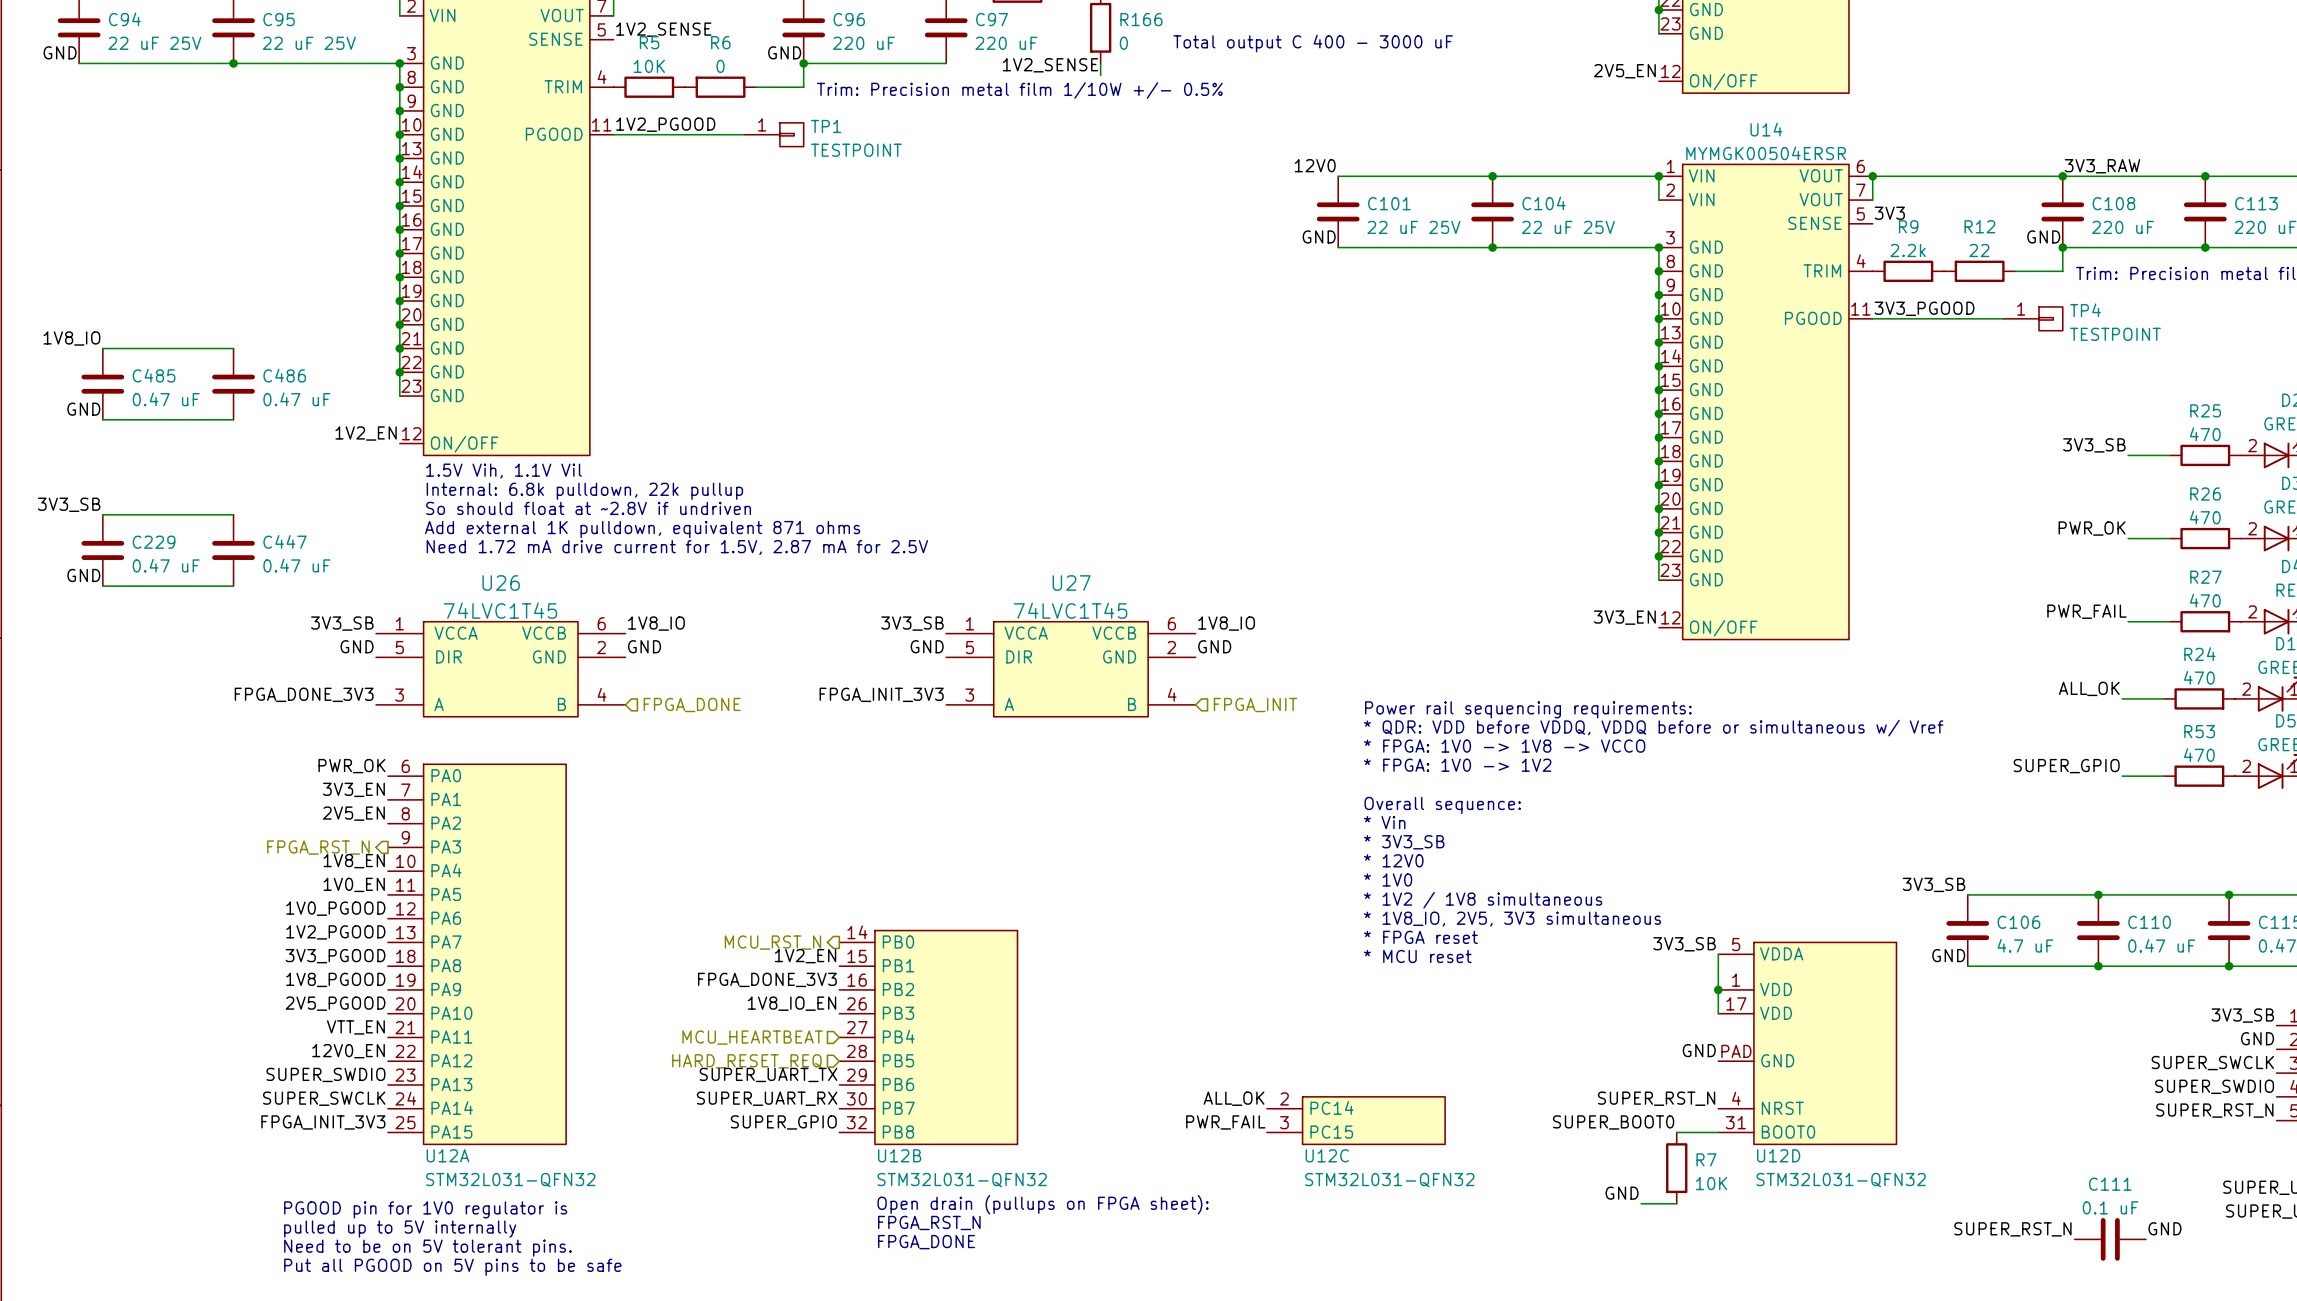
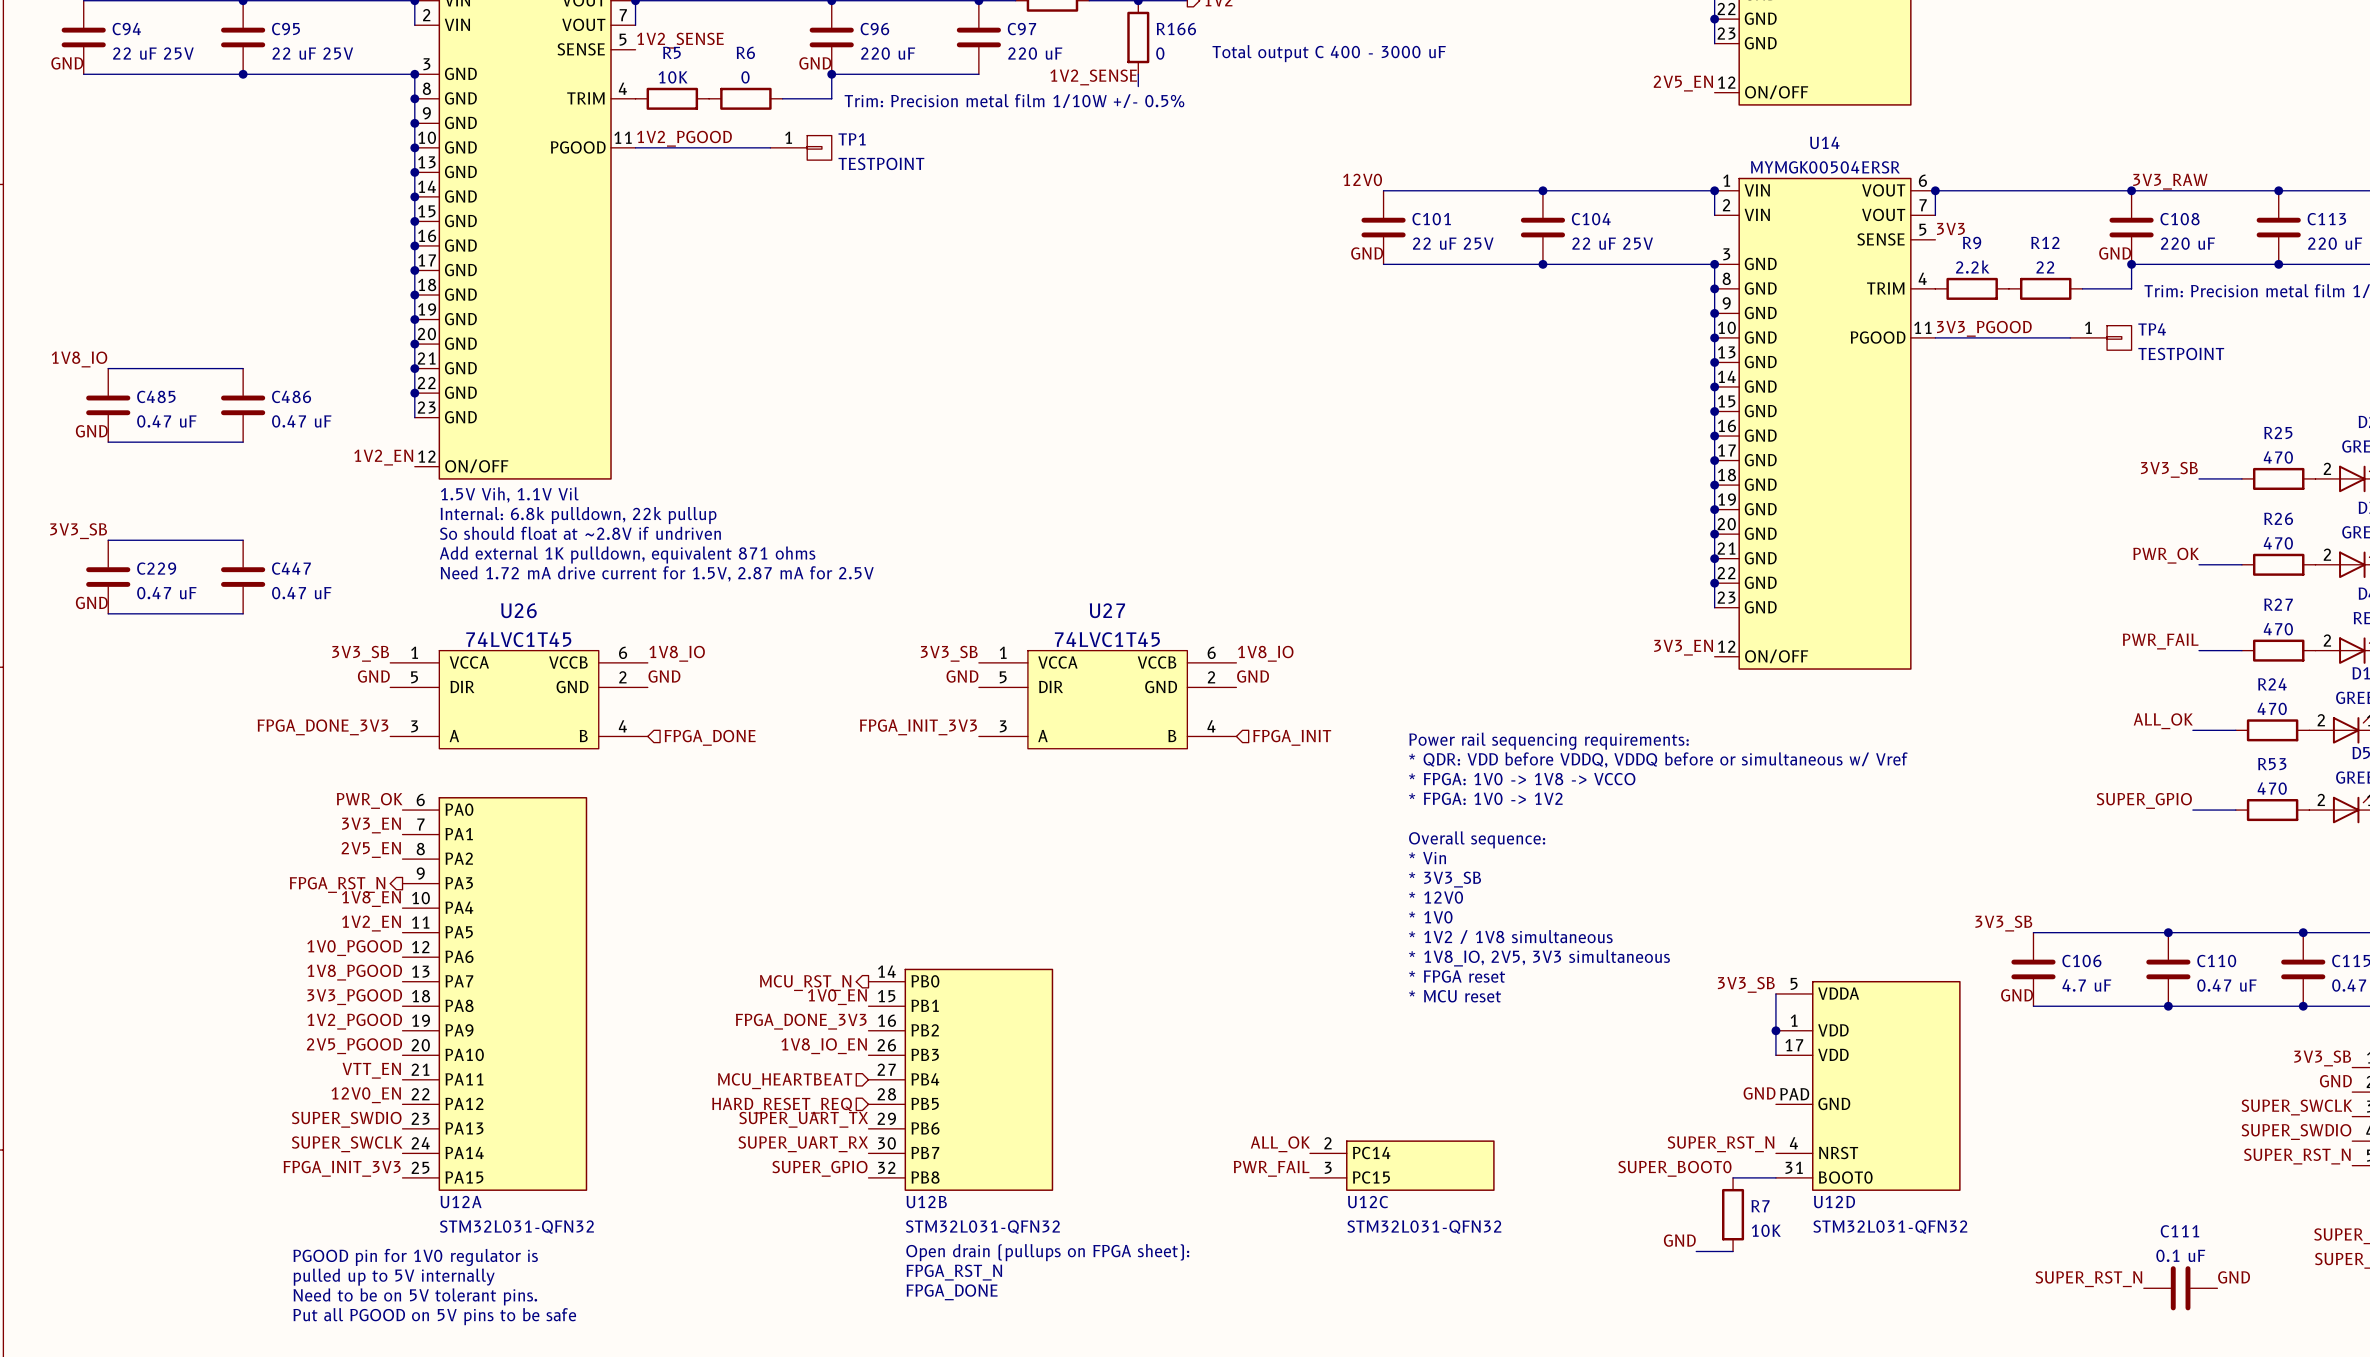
label: 1V0_EN (354, 884) -> 1V2_EN (371, 923)
label: 1V2_PGOOD (335, 932) -> 1V8_PGOOD (354, 972)
label: 1V2_EN (805, 956) -> 1V0_EN (837, 997)
label: 1V8_PGOOD (335, 979) -> 1V2_PGOOD (354, 1021)

